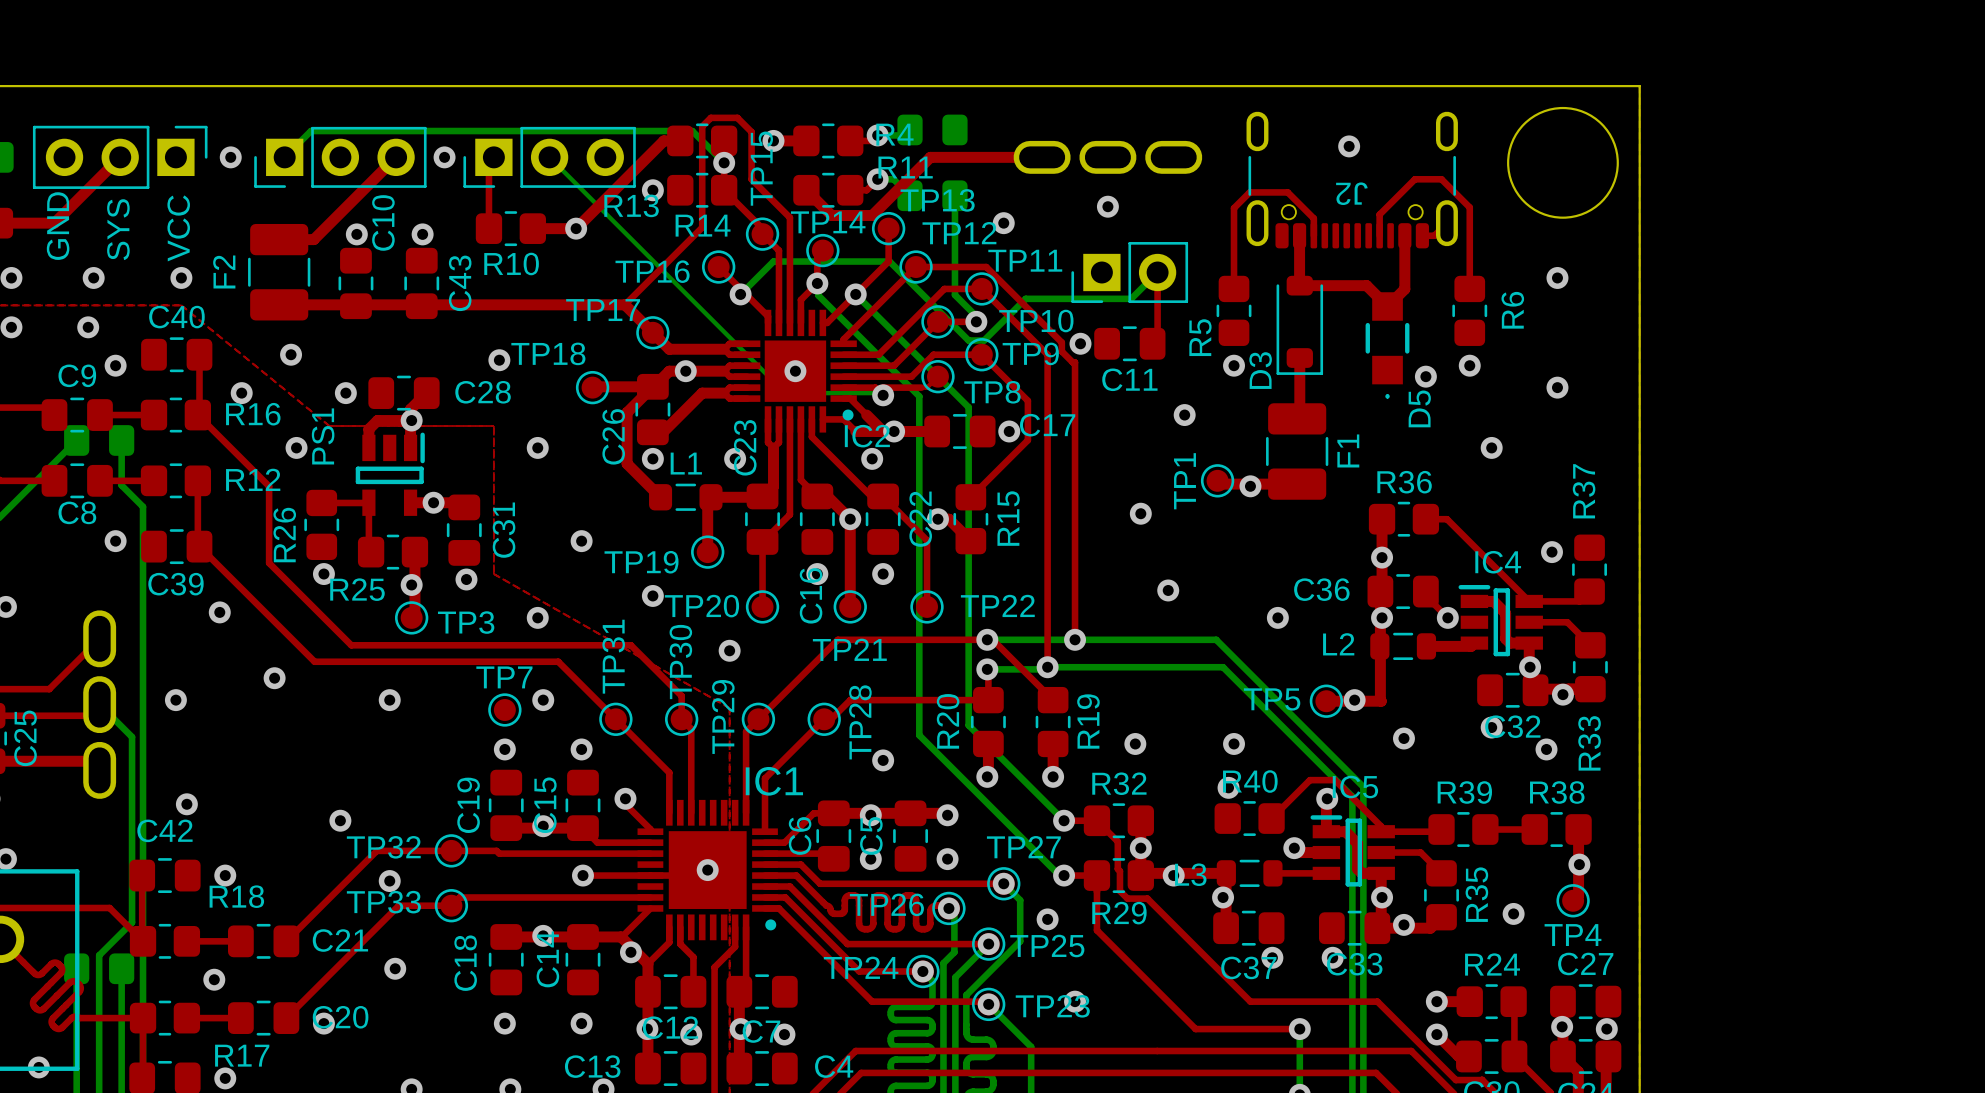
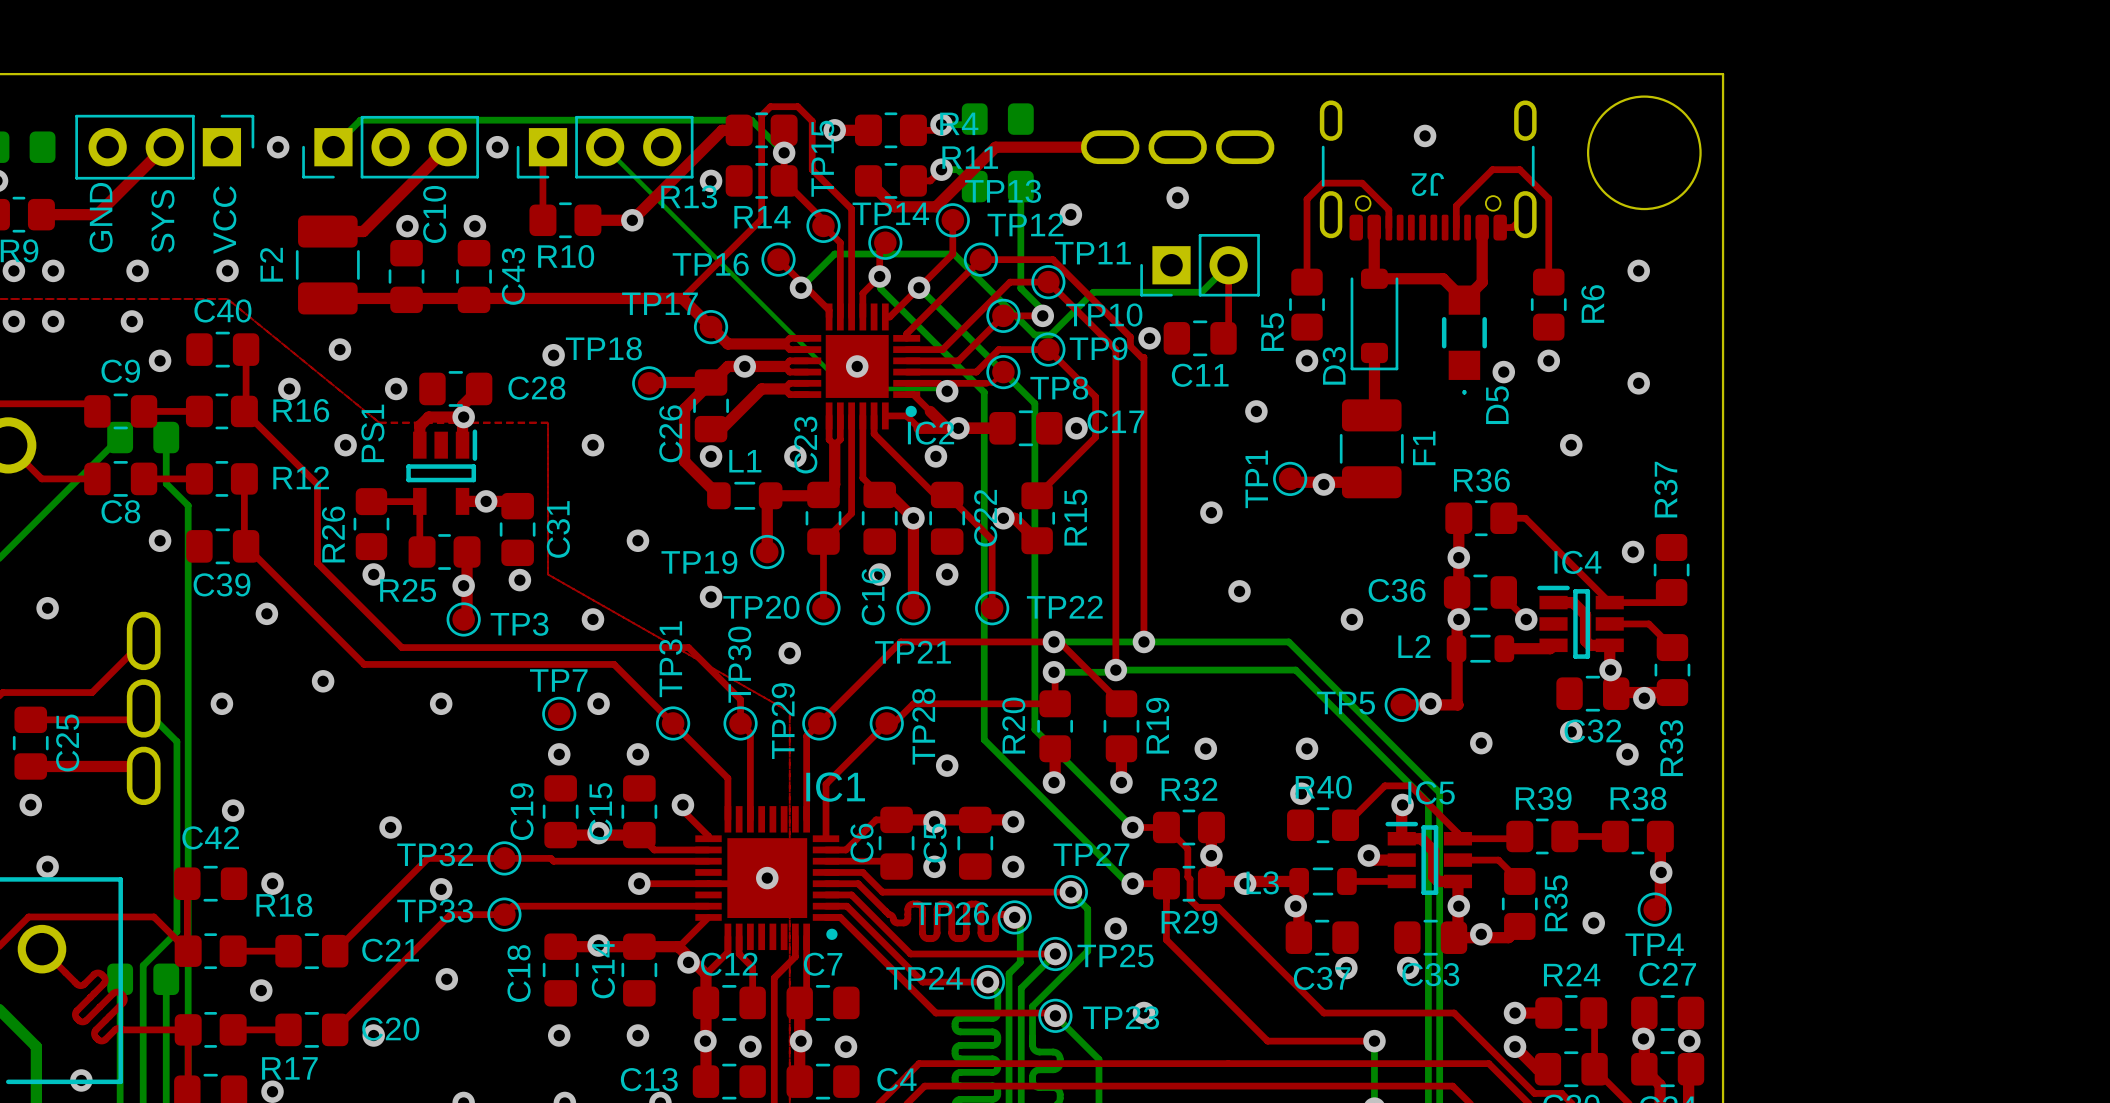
C12 name position: C12 (670, 1027) -> C12 (729, 964)
C7 name position: C7 (761, 1031) -> C7 (823, 964)

